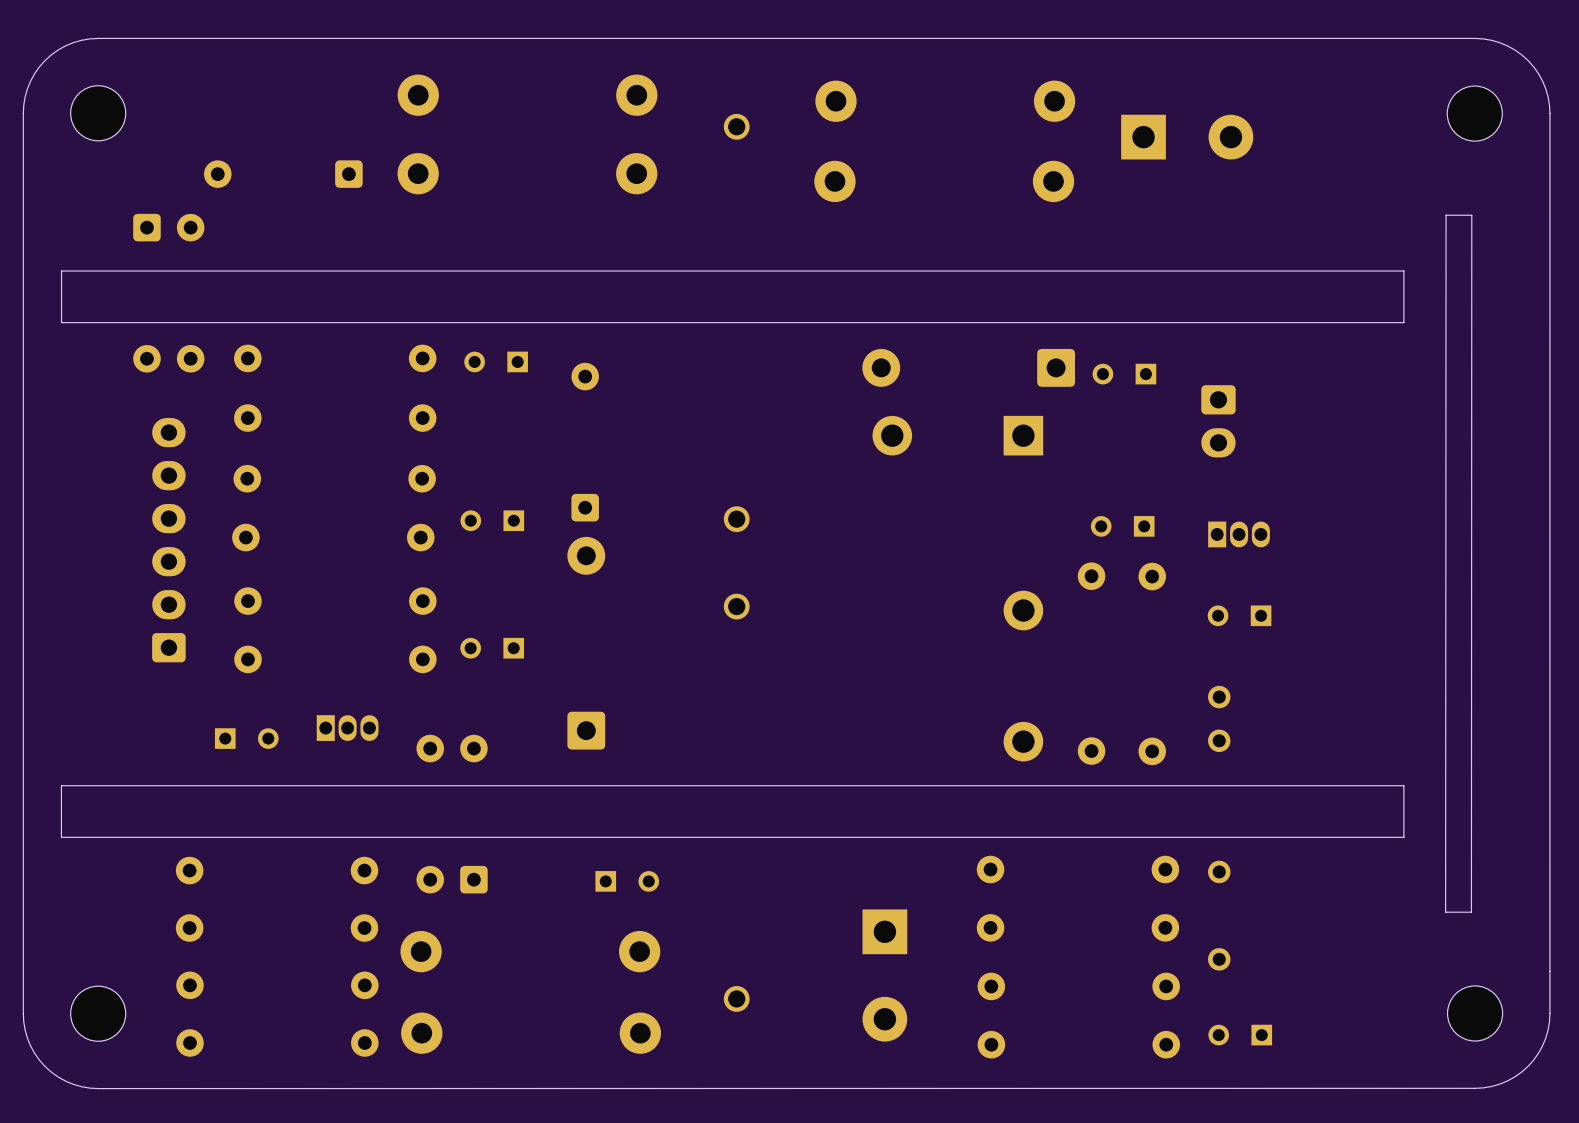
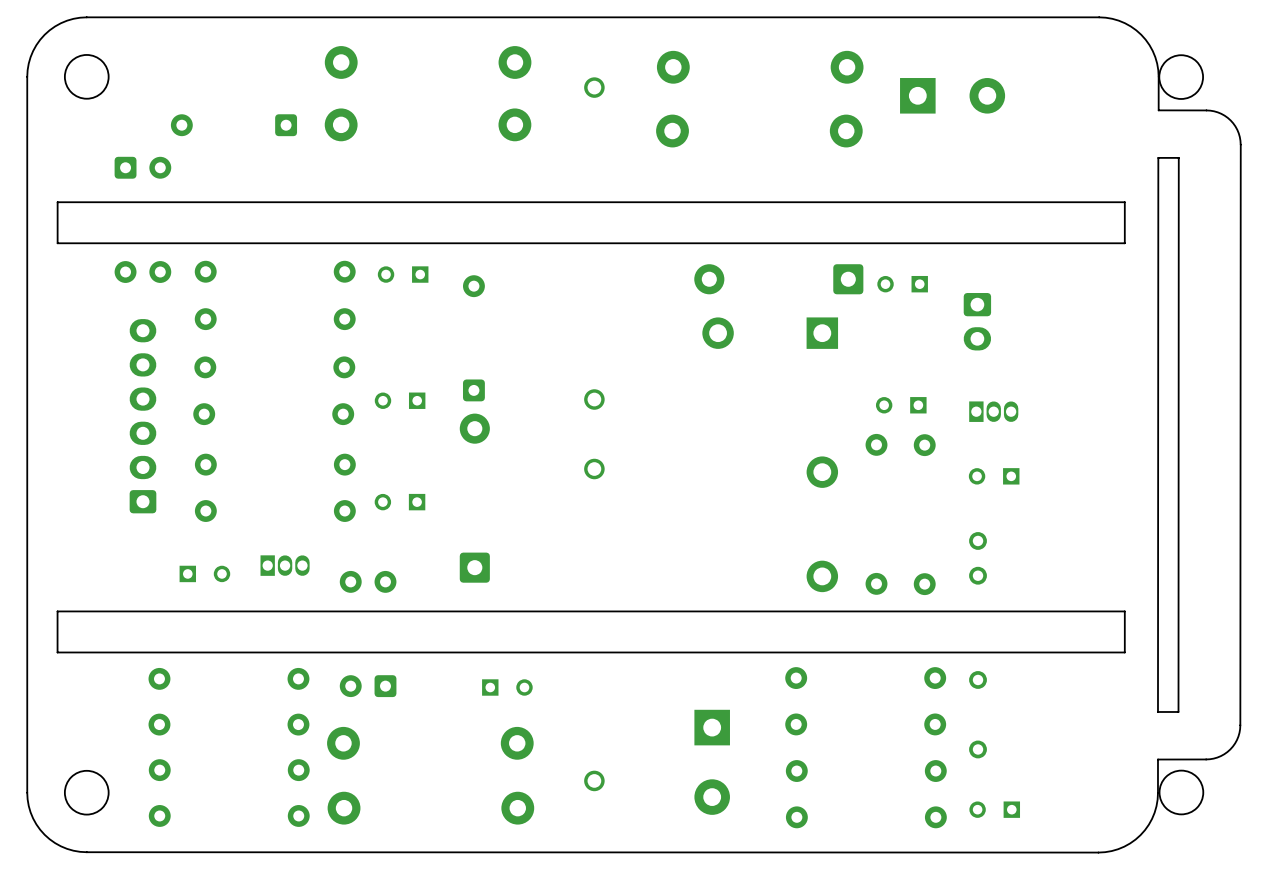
board edge: (1371, 38) (1474, 38) (1499, 42) (1521, 54) (1533, 66) (1542, 80) (1549, 105) (1549, 1013) (1548, 1030) (1542, 1045) (1533, 1060) (1521, 1072) (1499, 1084) (1475, 1088) (98, 1088) -> (1099, 17) (1124, 23) (1136, 30) (1149, 45) (1158, 70) (1158, 110) (1206, 110) (1221, 113) (1235, 126) (1240, 144) (1240, 729) (1232, 746) (1217, 757) (1206, 759) (1157, 759) (1156, 806) (1148, 824) (1135, 839) (1118, 849) (1098, 852) (86, 852)

